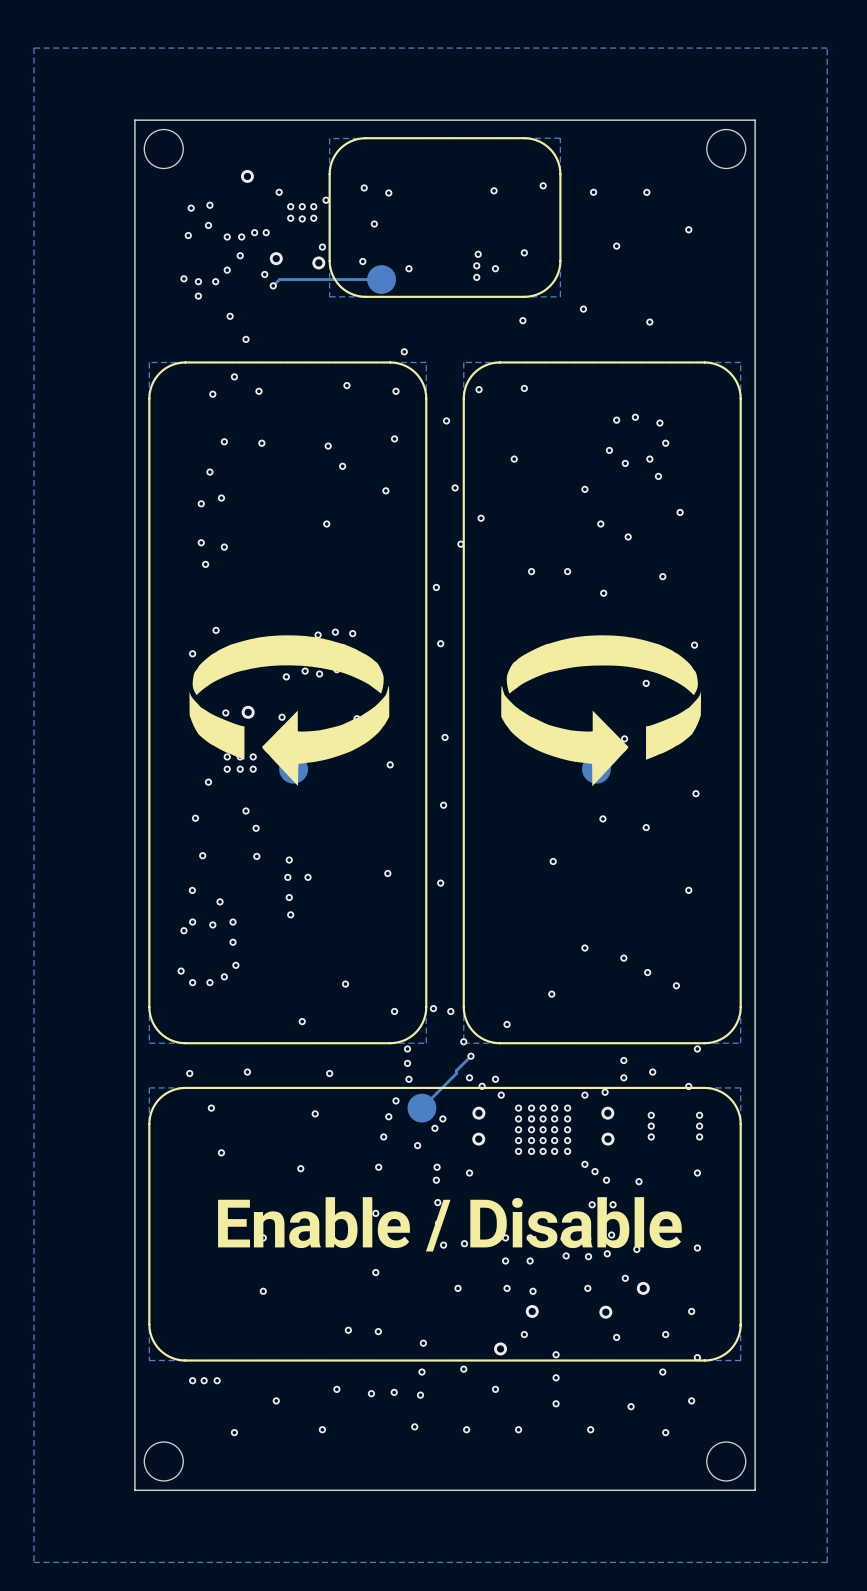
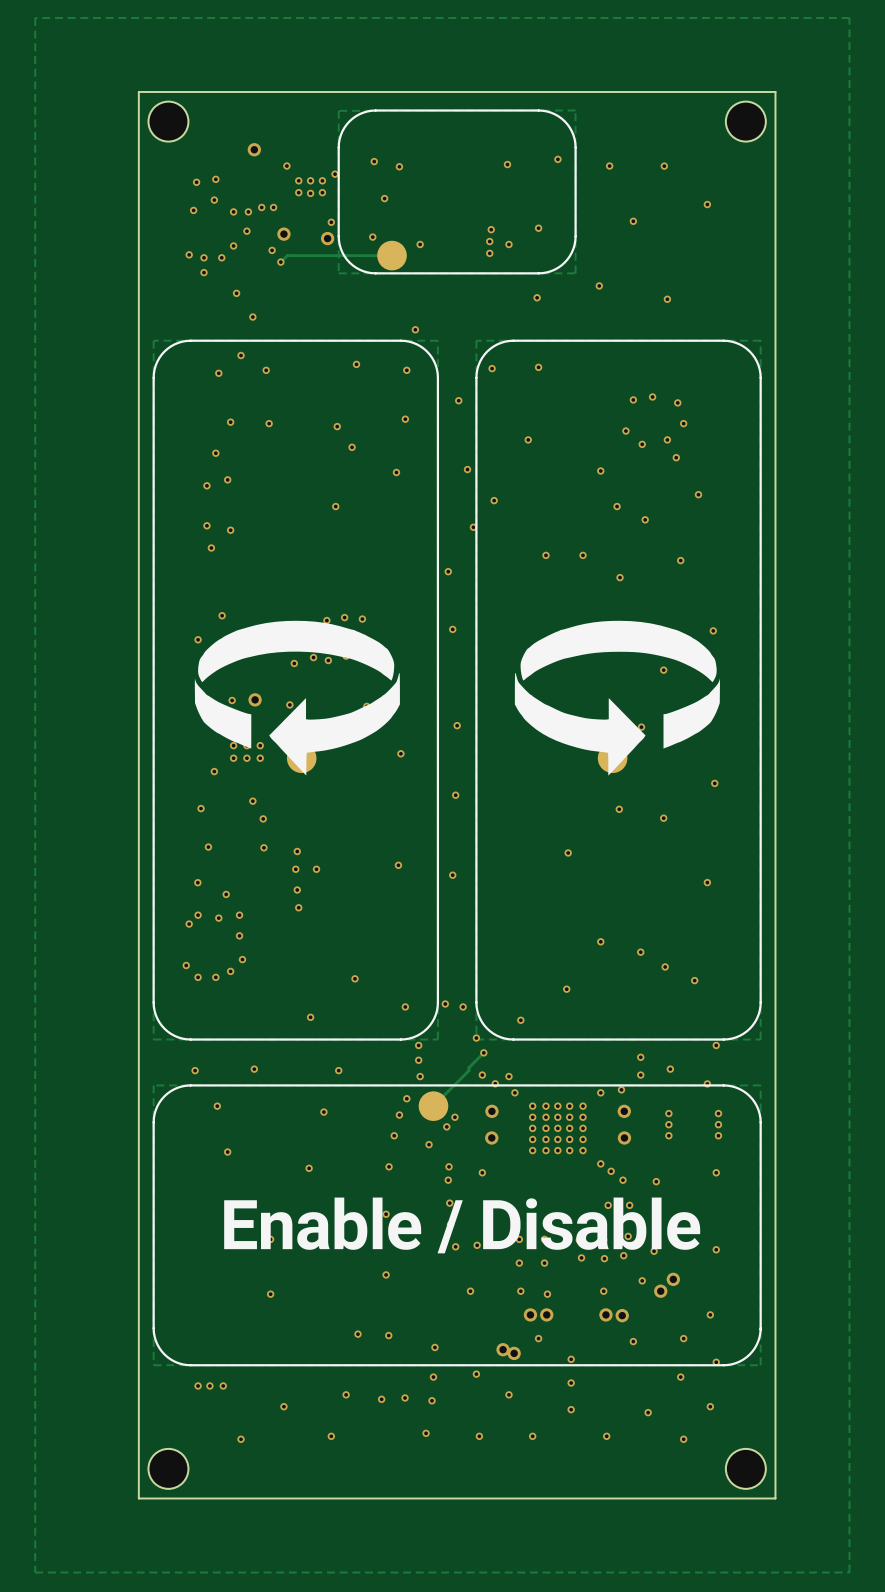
via: none -> (673, 1279)
via: none -> (530, 1314)
via: none -> (605, 1314)
via: none -> (503, 1349)

